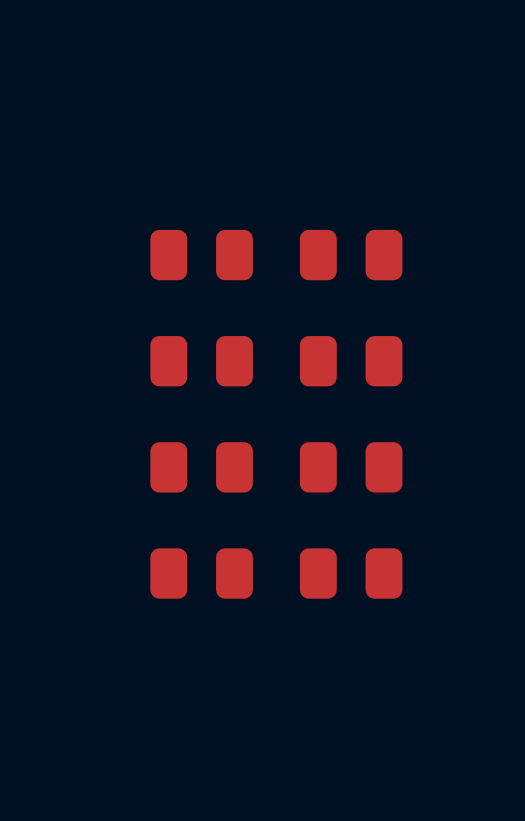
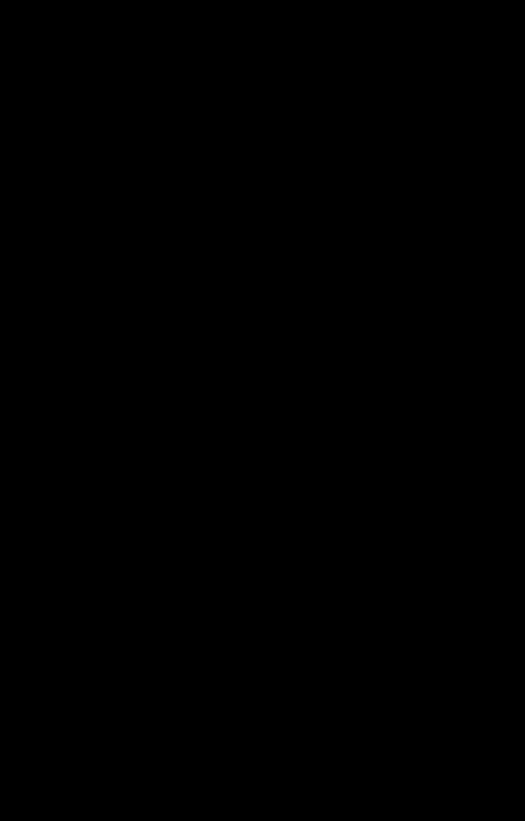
part: (201, 255) -> none
part: (351, 255) -> none
part: (201, 361) -> none
part: (351, 361) -> none
part: (201, 467) -> none
part: (351, 467) -> none
part: (201, 573) -> none
part: (351, 573) -> none

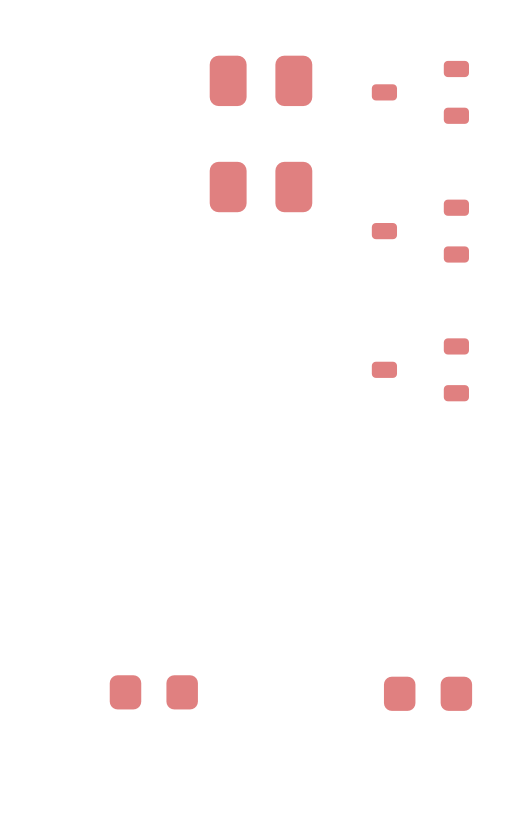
part: none -> (260, 80)
part: none -> (420, 92)
part: none -> (260, 187)
part: none -> (420, 231)
part: none -> (420, 369)
part: none -> (153, 692)
part: none -> (428, 693)

